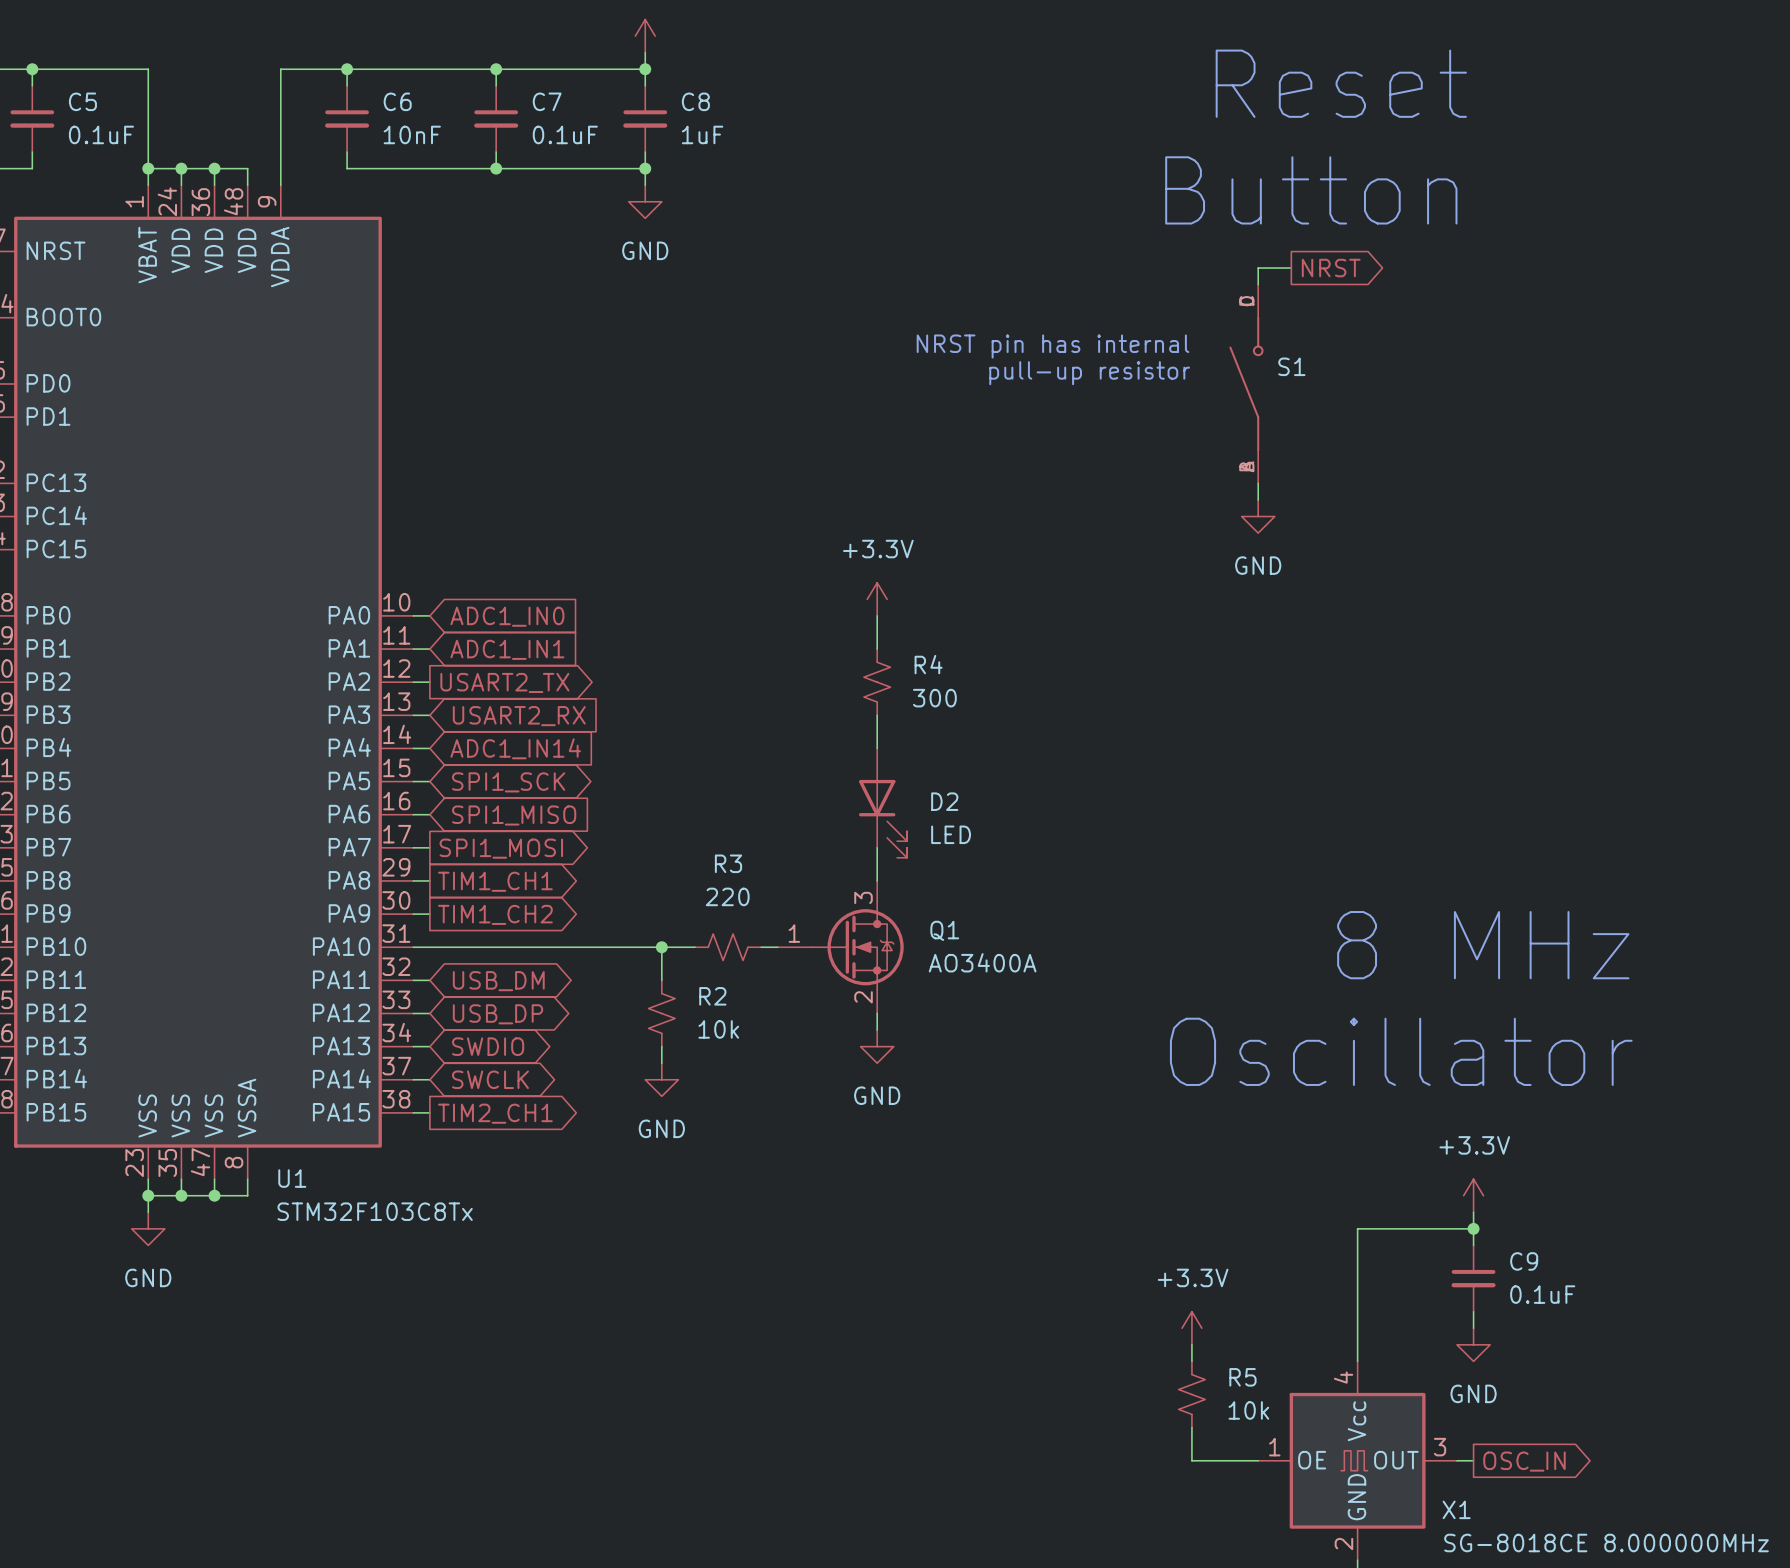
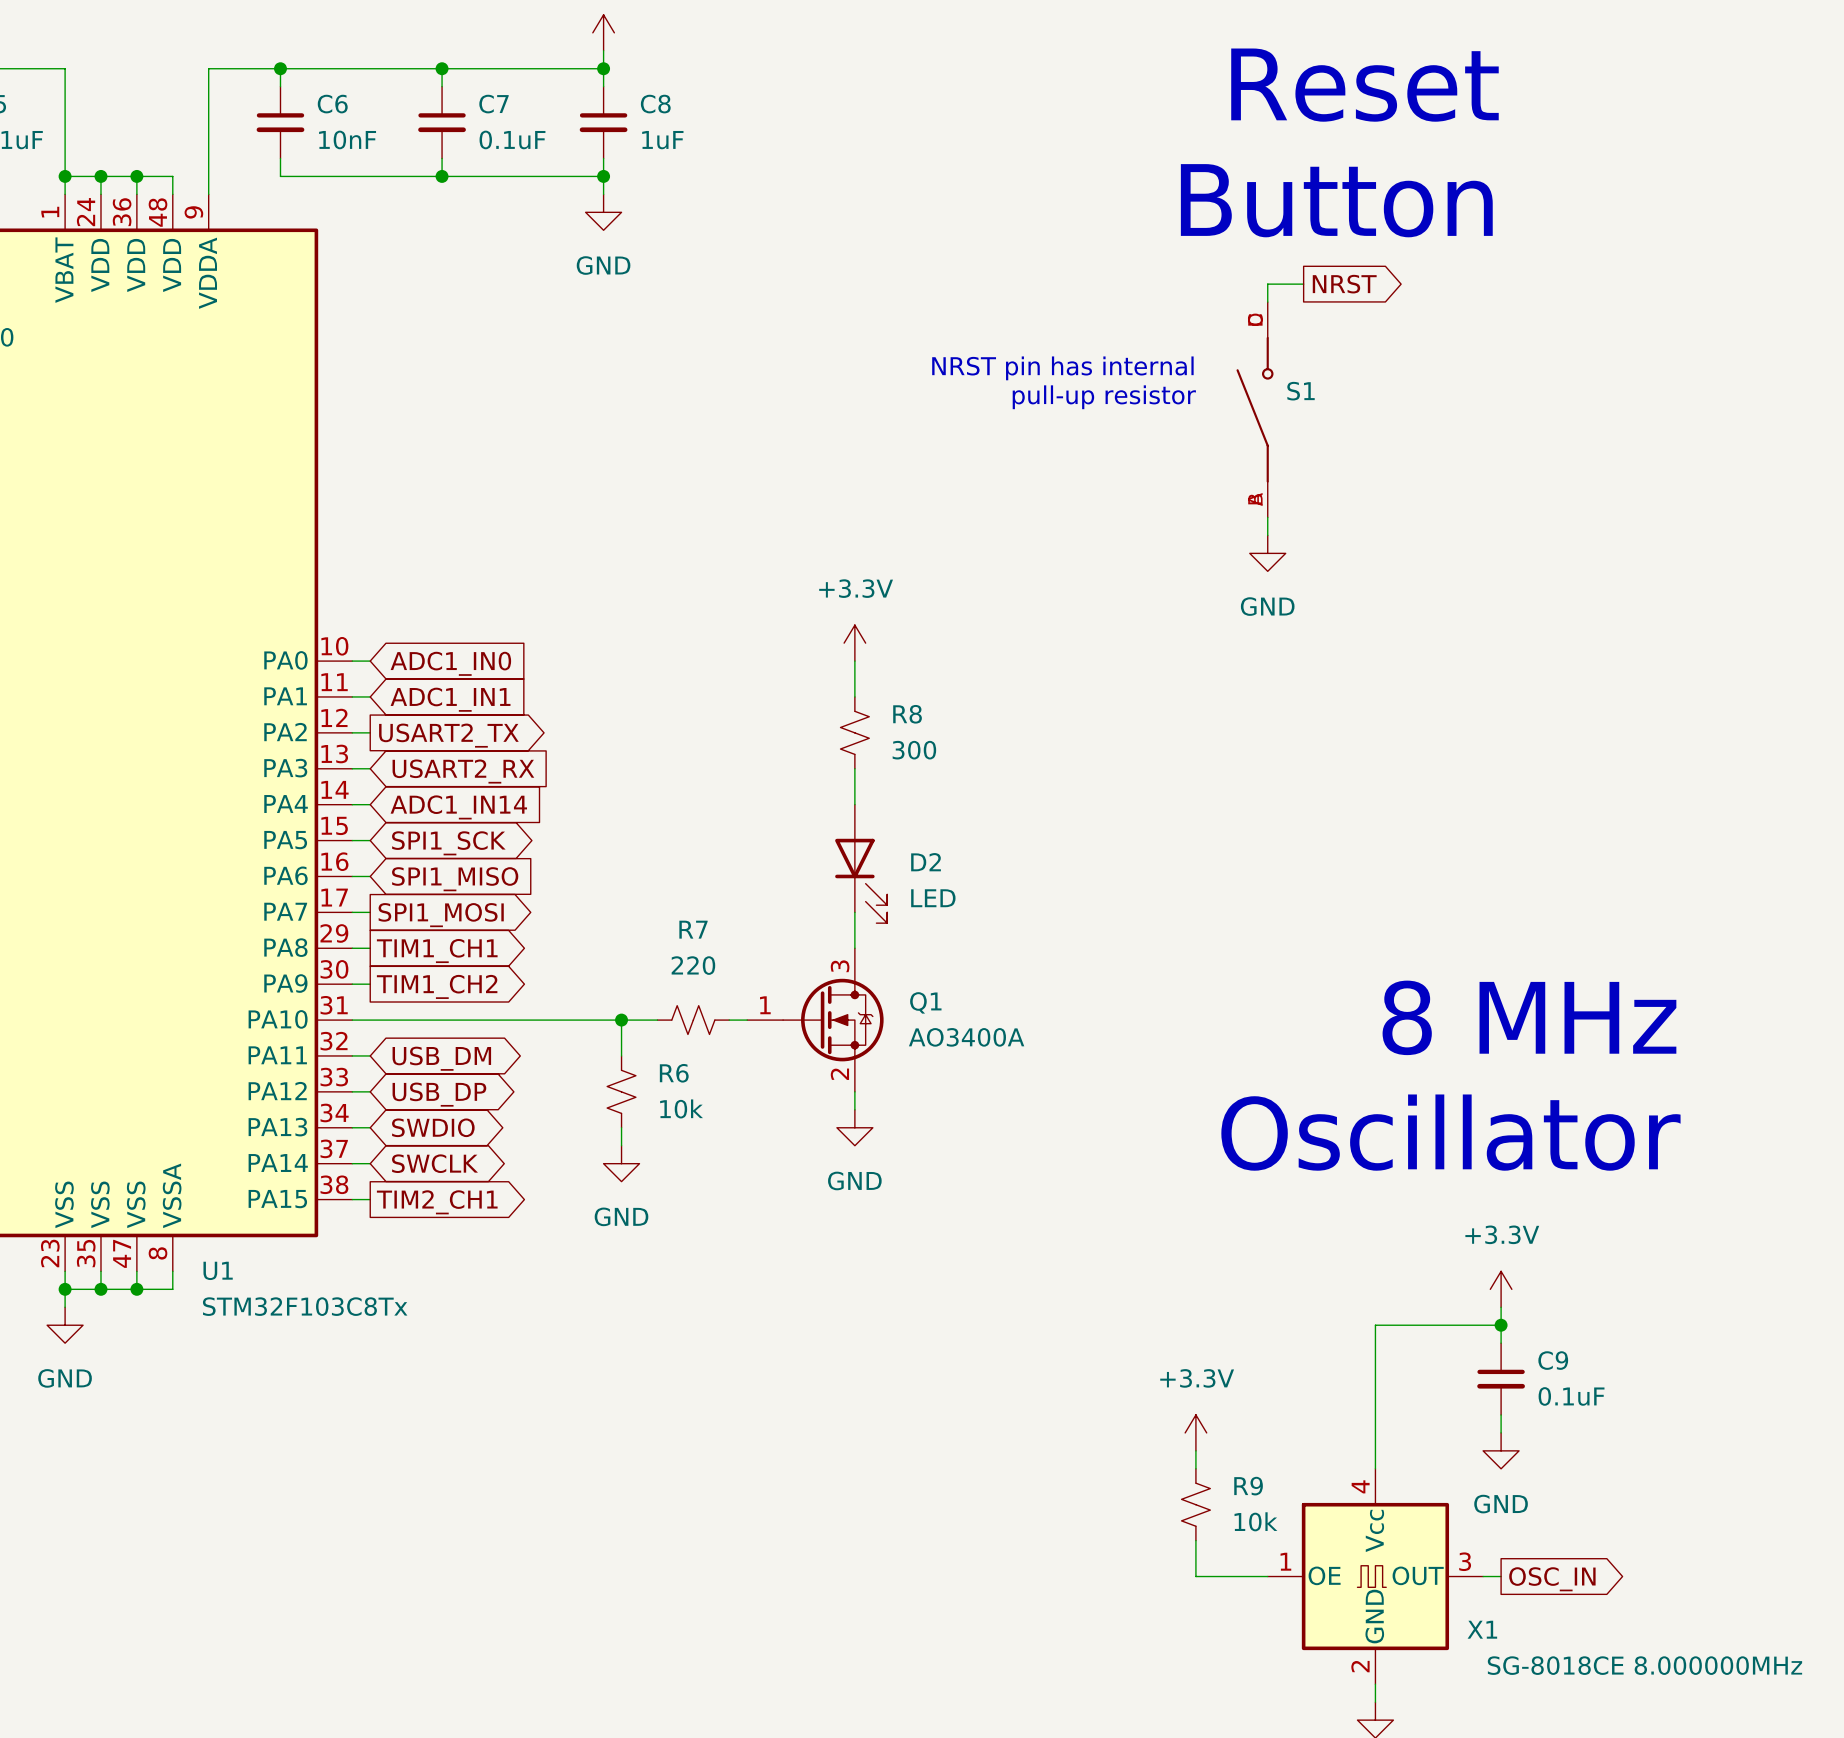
R4 name: R4 (928, 664) -> R8 (907, 714)
R3 name: R3 (728, 863) -> R7 (693, 929)
R2 name: R2 (712, 996) -> R6 (674, 1073)
R5 name: R5 (1242, 1377) -> R9 (1248, 1486)

